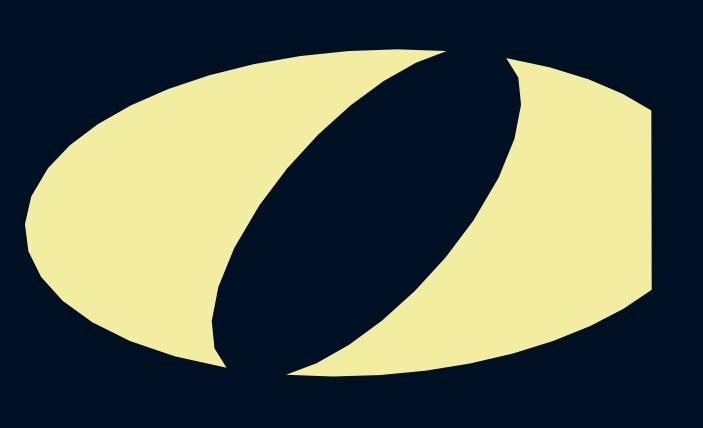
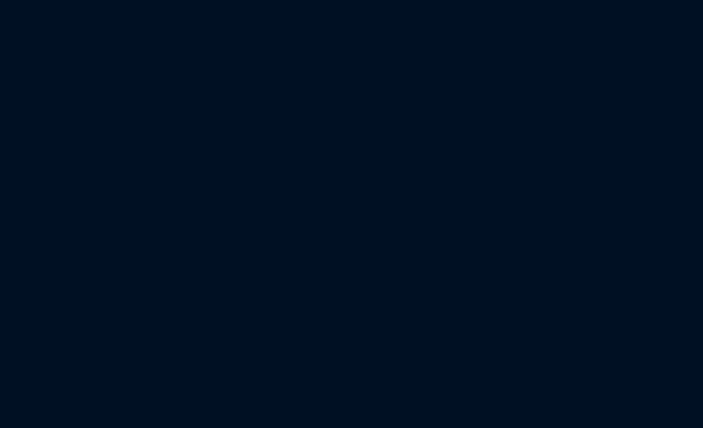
drawing: [24, 49, 652, 377] -> none

